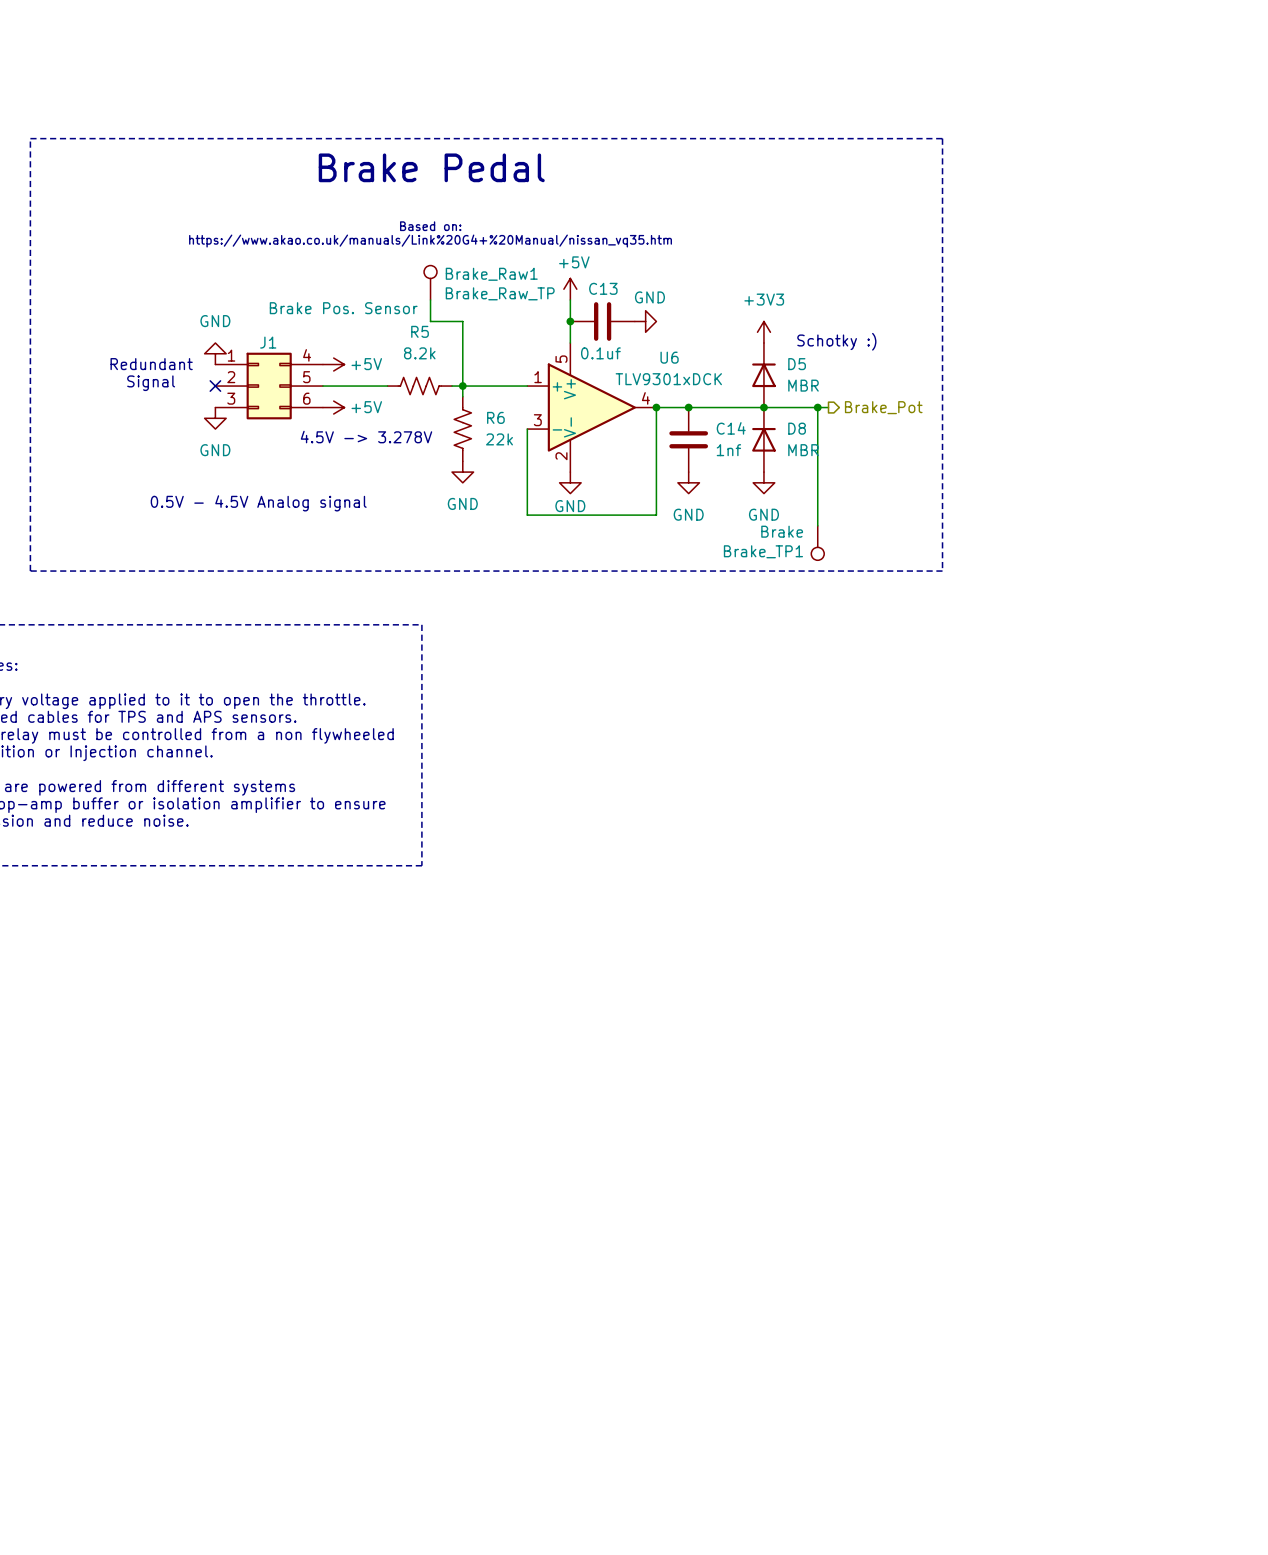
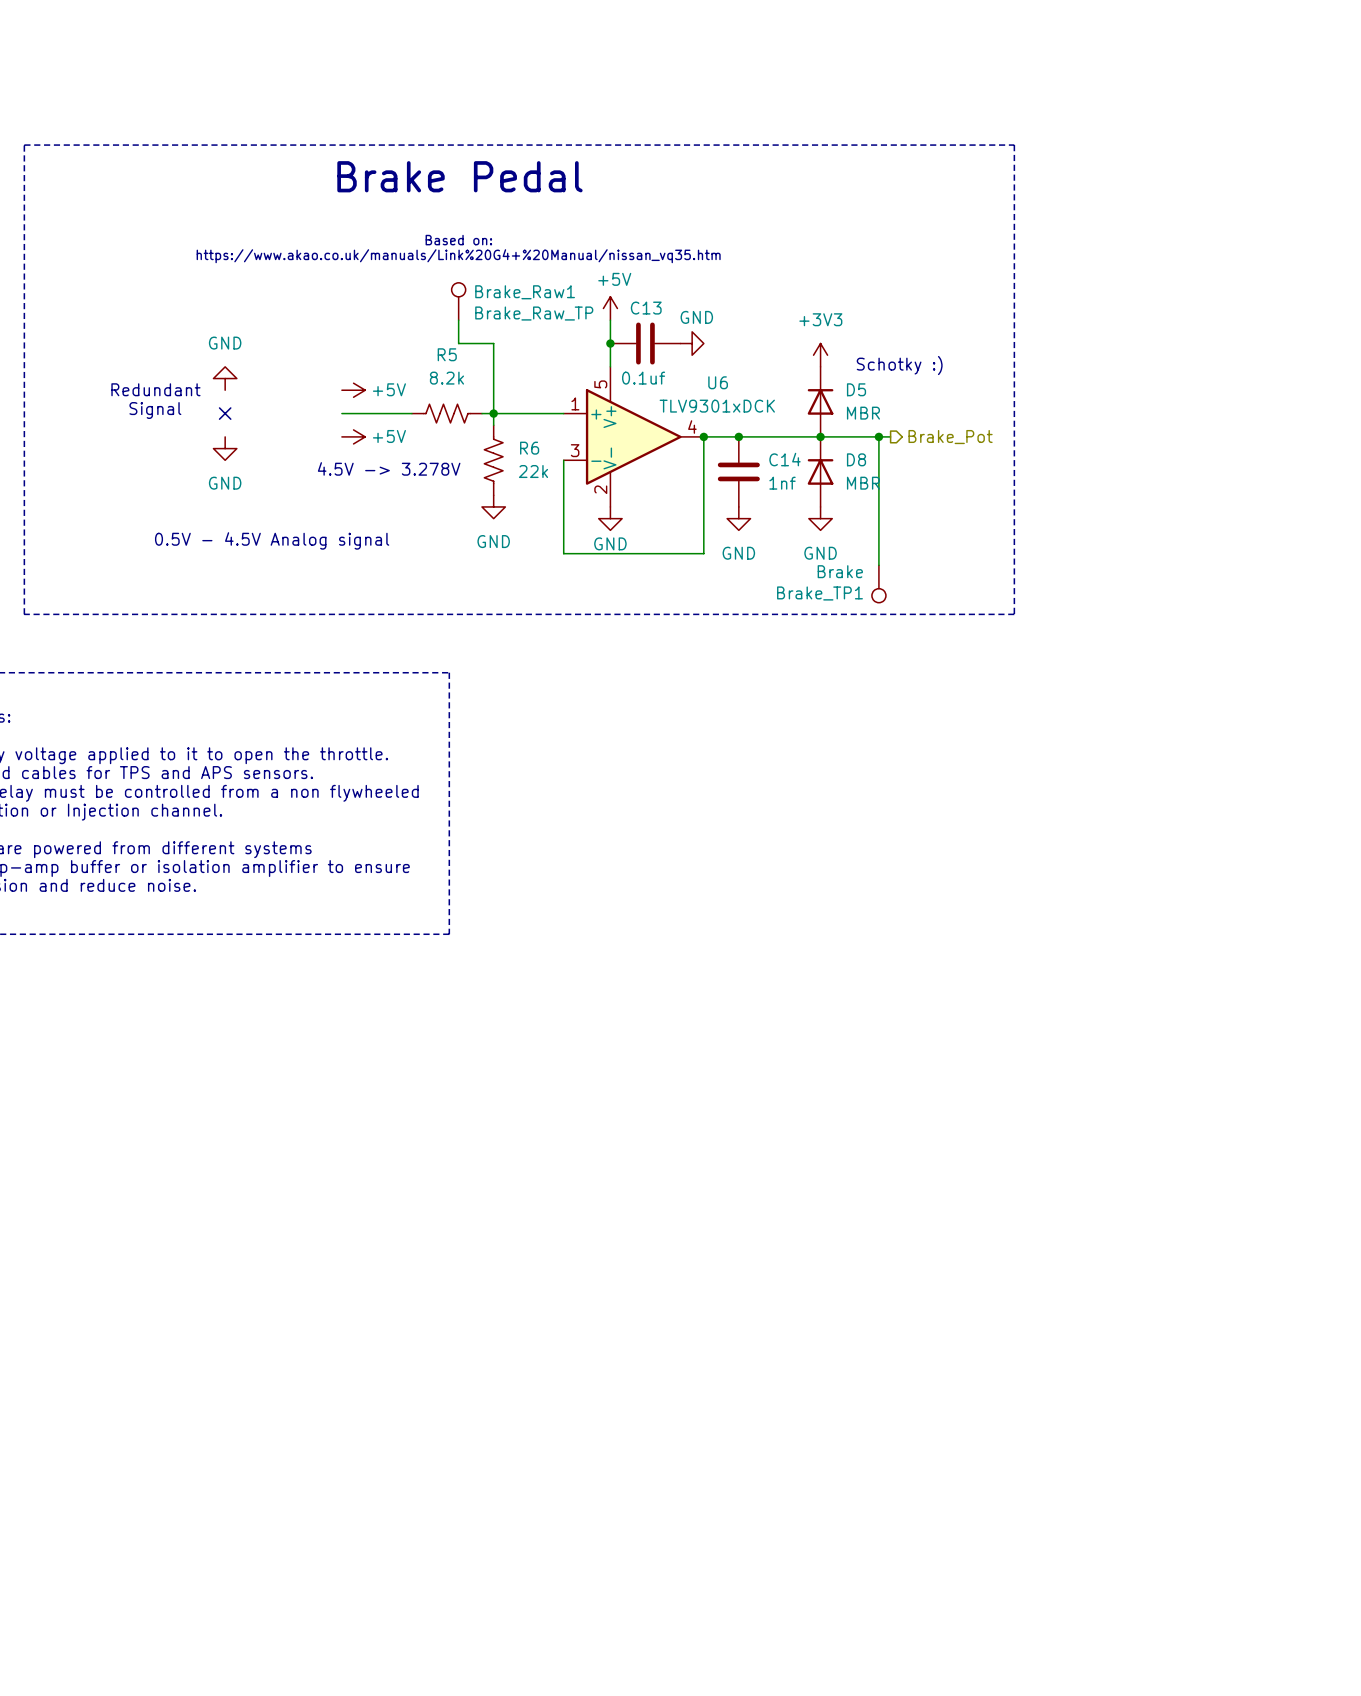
J1: Brake Pos. Sensor (269, 386) -> none

